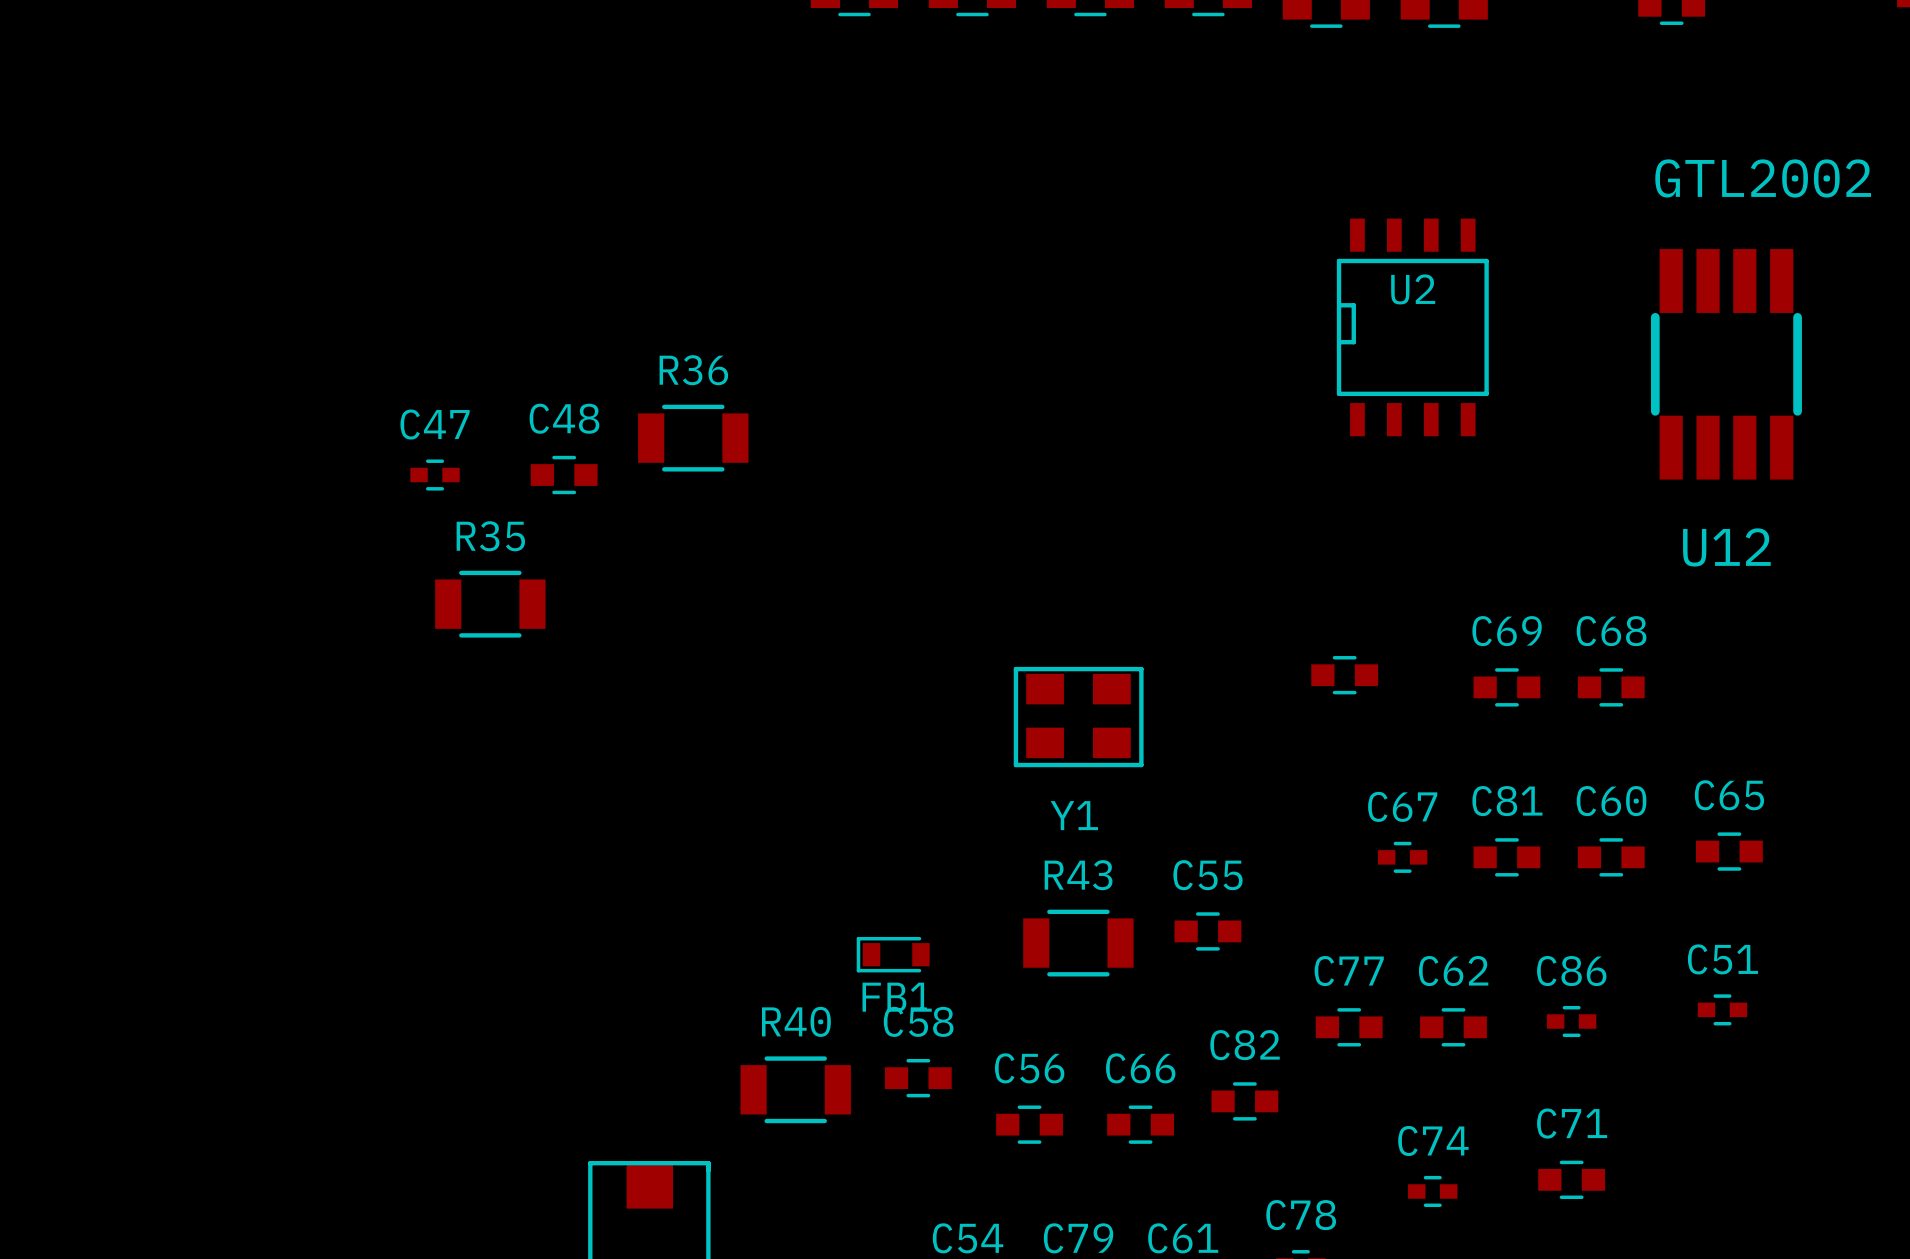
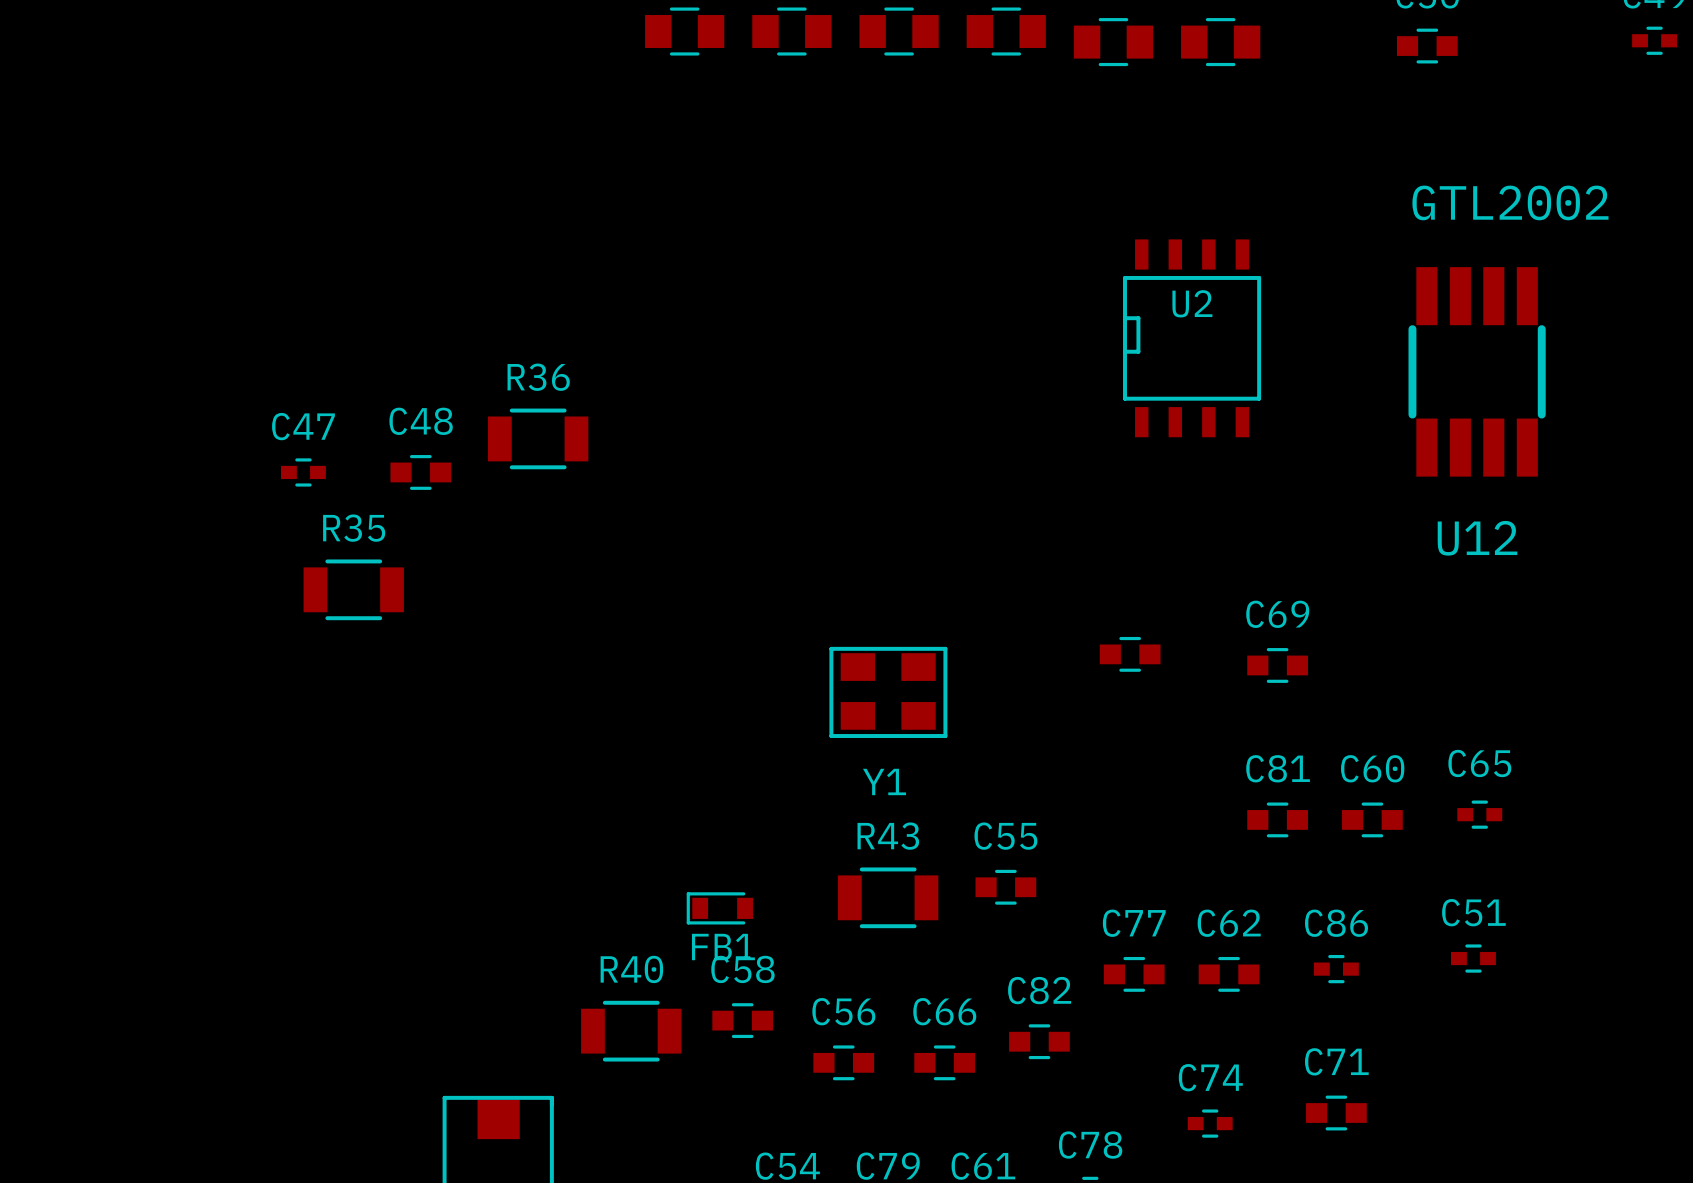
C68: (1611, 687) -> none
C65 footprint: [1695, 832, 1763, 871] -> [1457, 800, 1503, 829]
C67: (1402, 857) -> none

